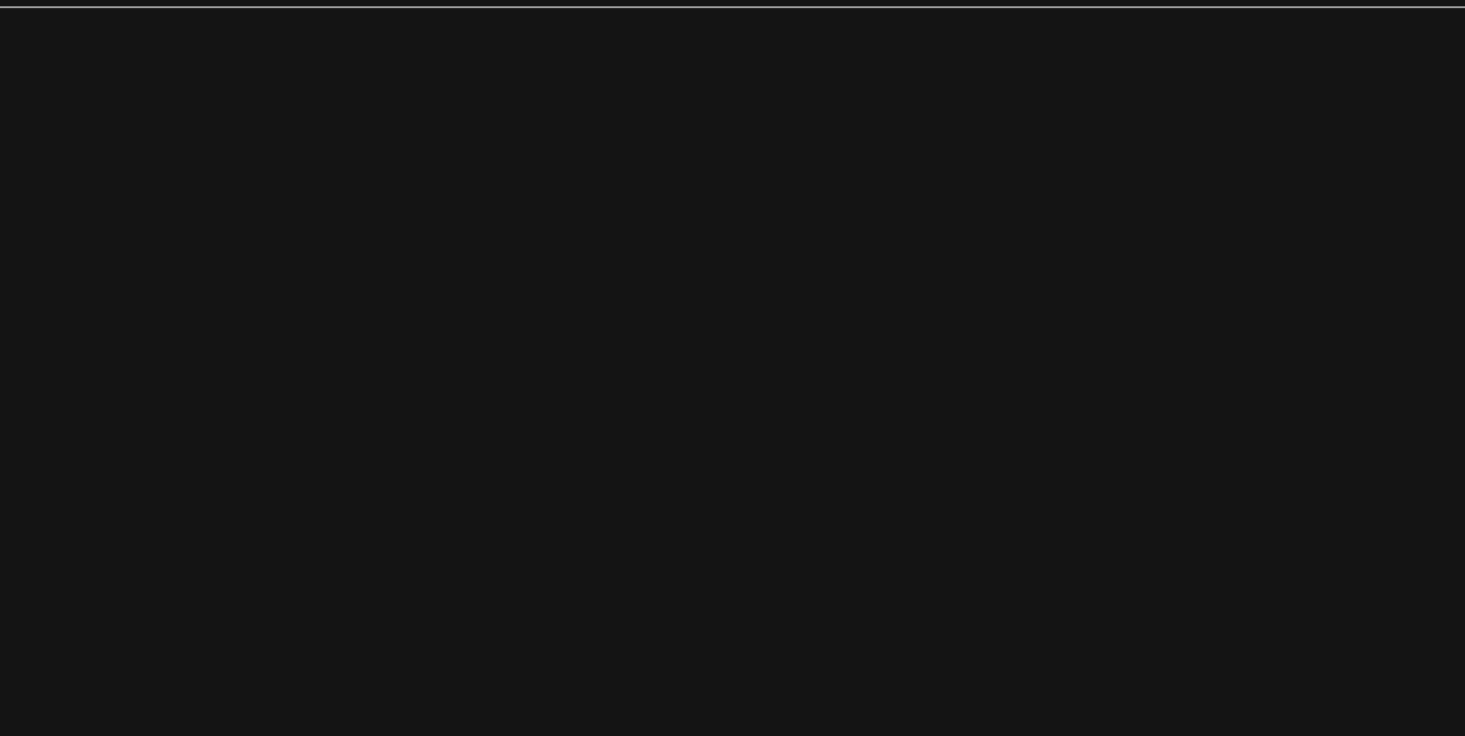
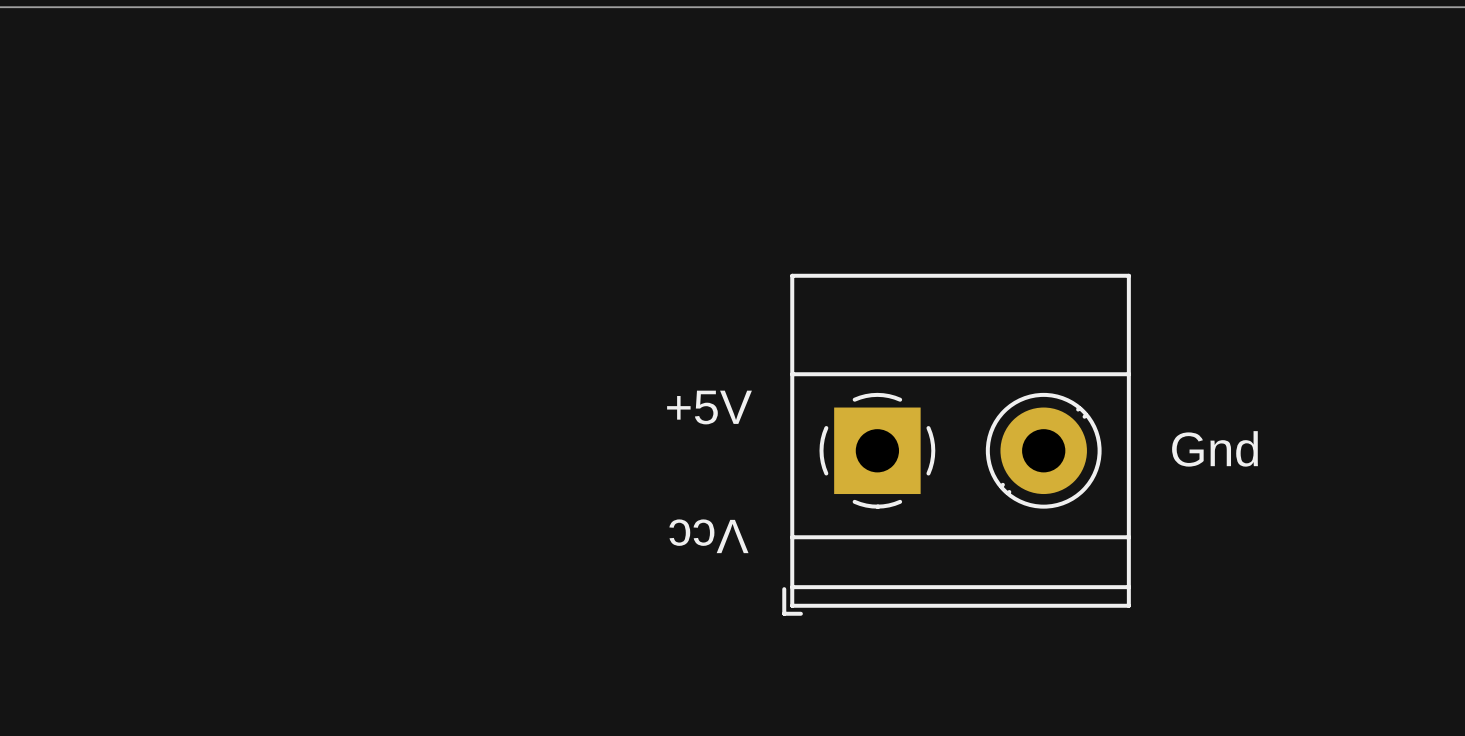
text: none -> +5V (709, 407)
part: none -> (956, 444)
text: none -> Gnd (1215, 448)
text: none -> Vcc (708, 536)

